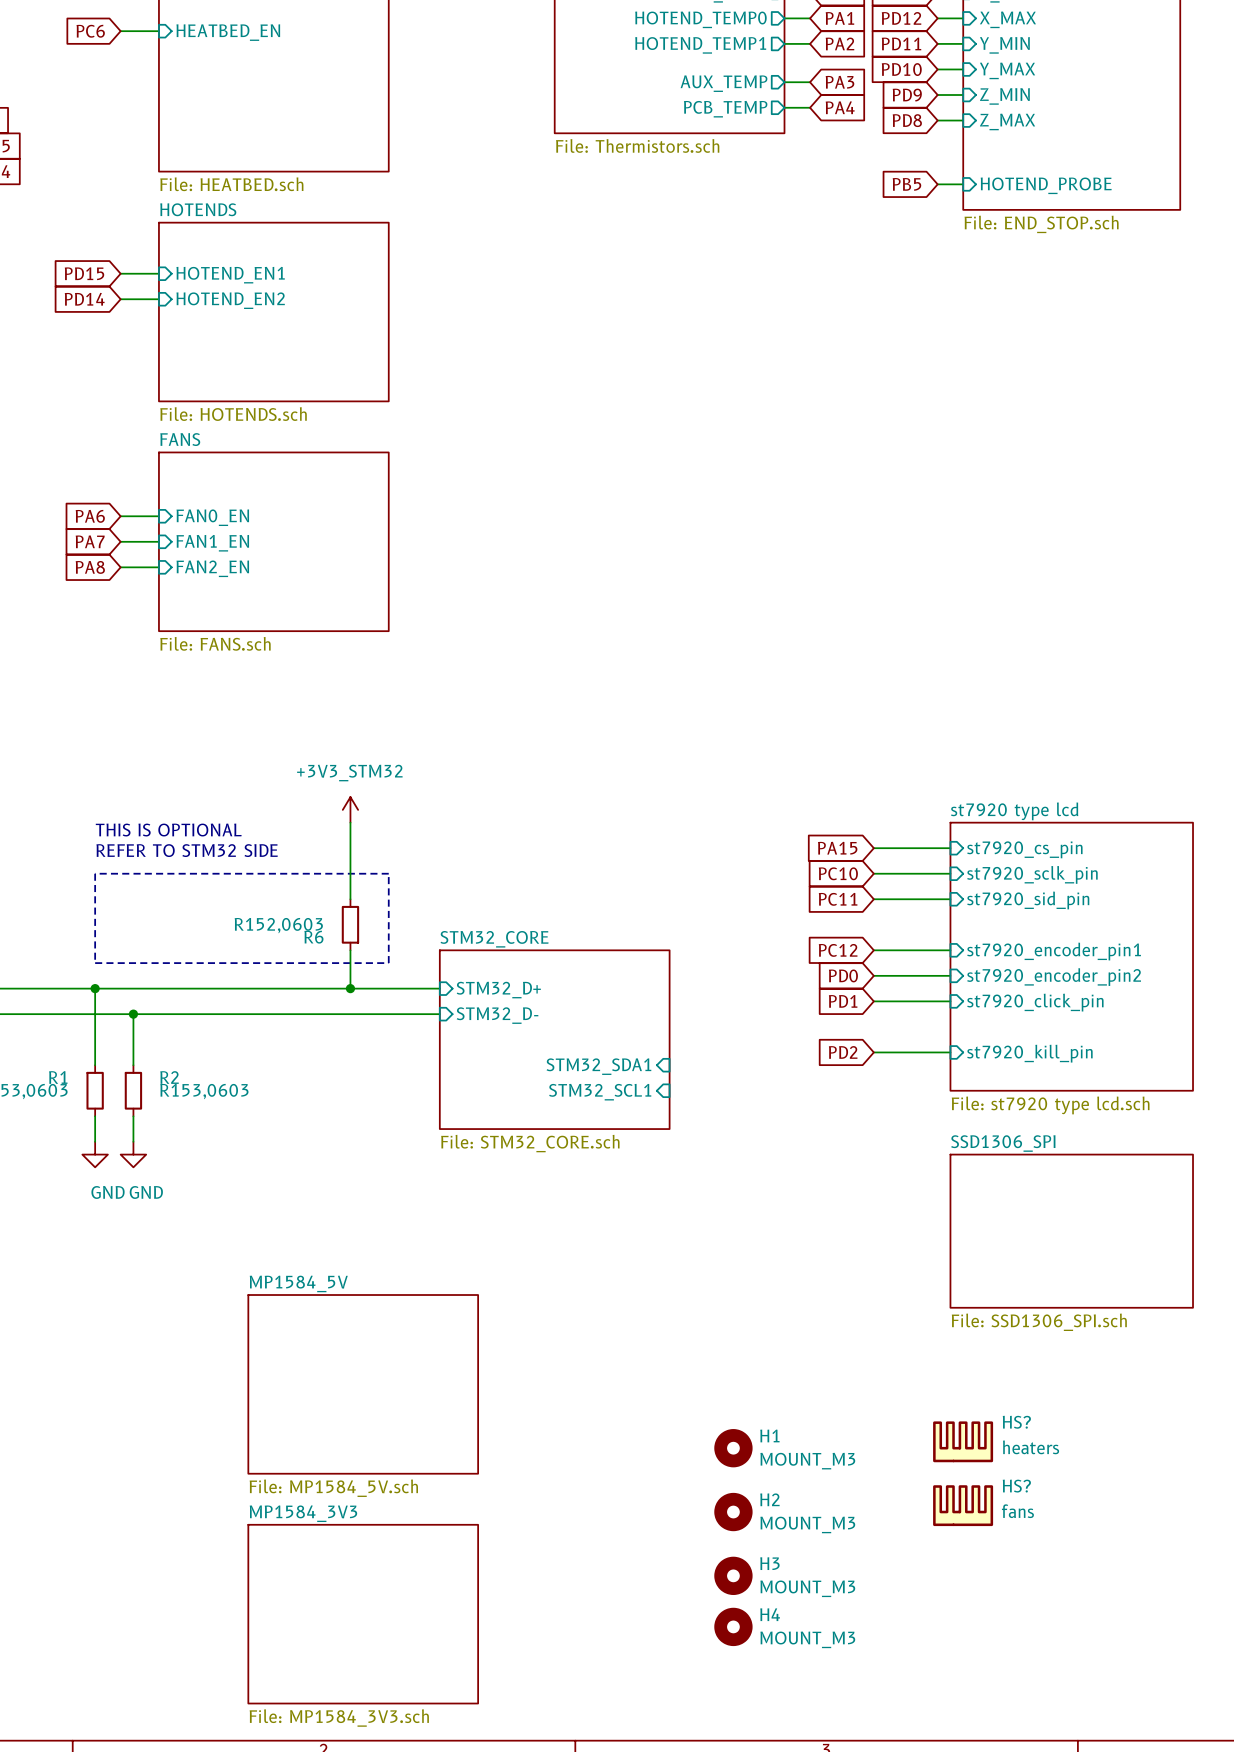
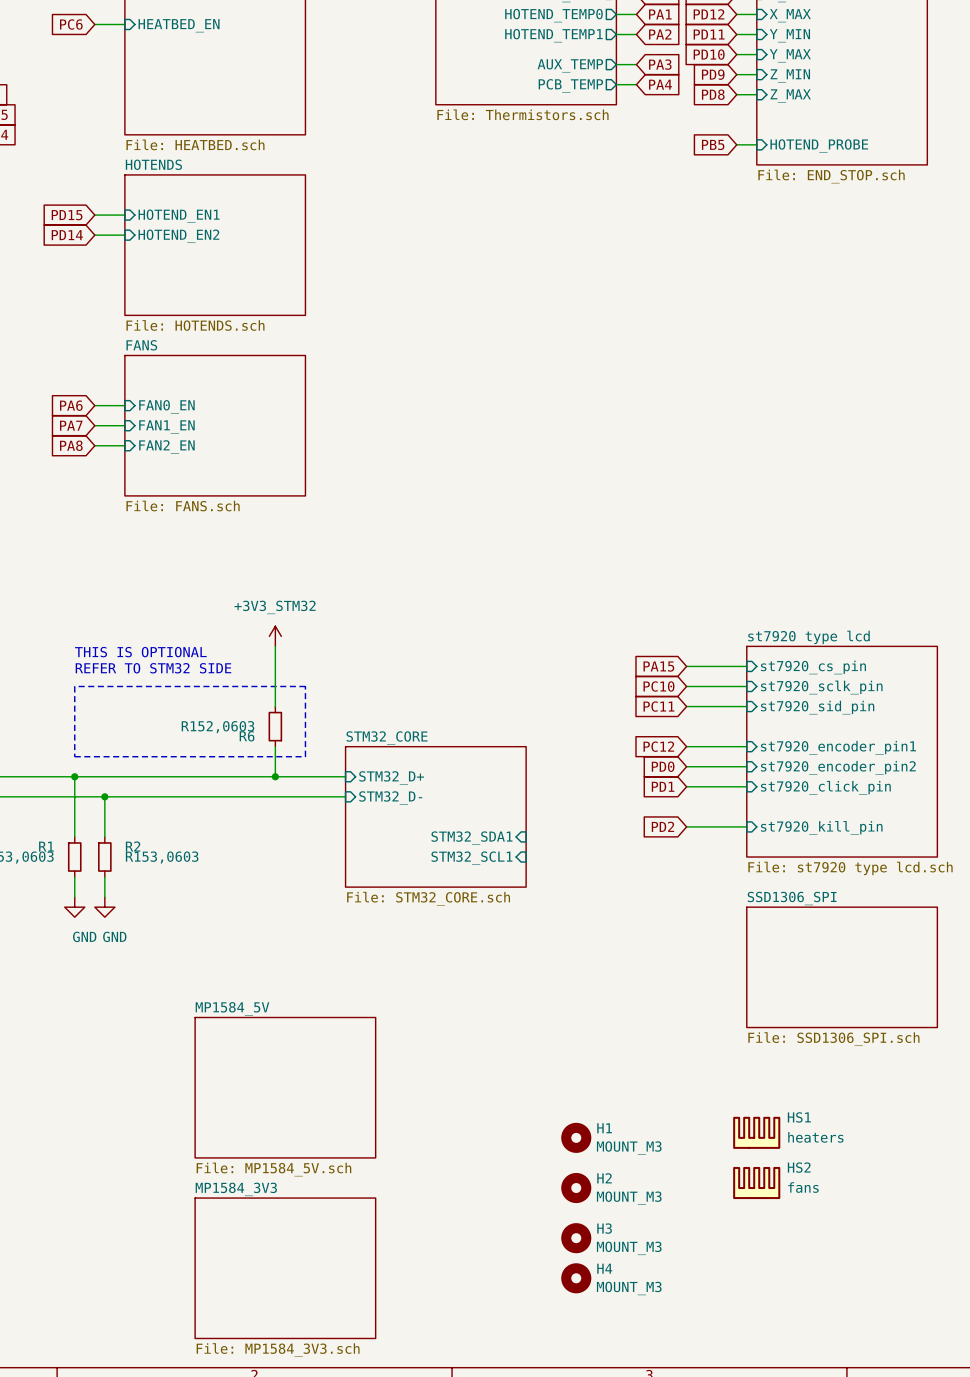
HS? name: HS? (1016, 1422) -> HS1 (799, 1117)
HS? name: HS? (1016, 1486) -> HS2 (799, 1167)

